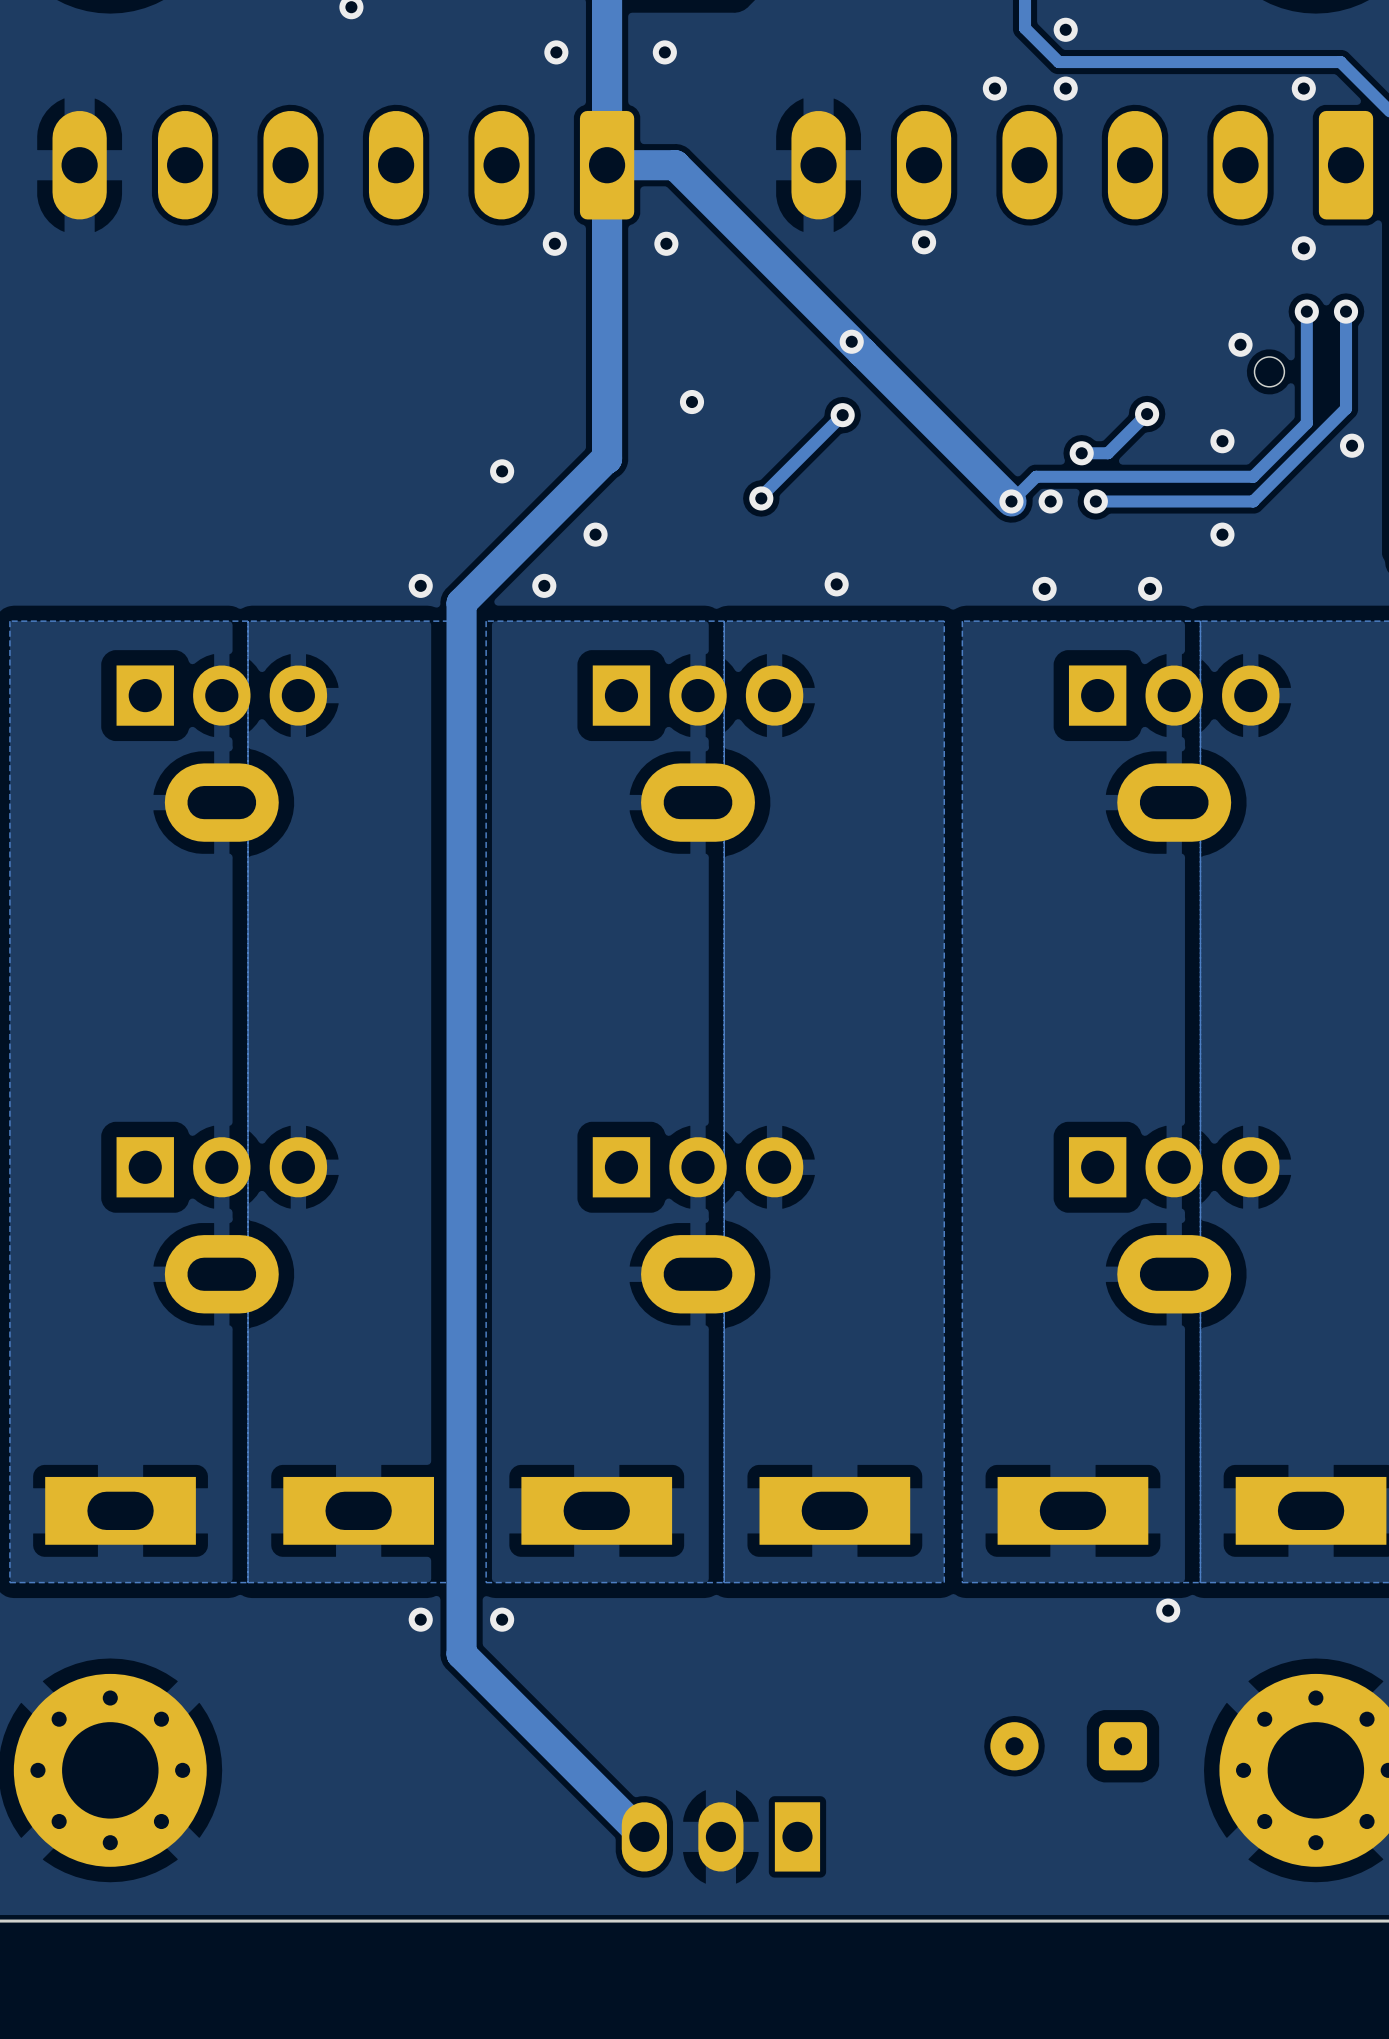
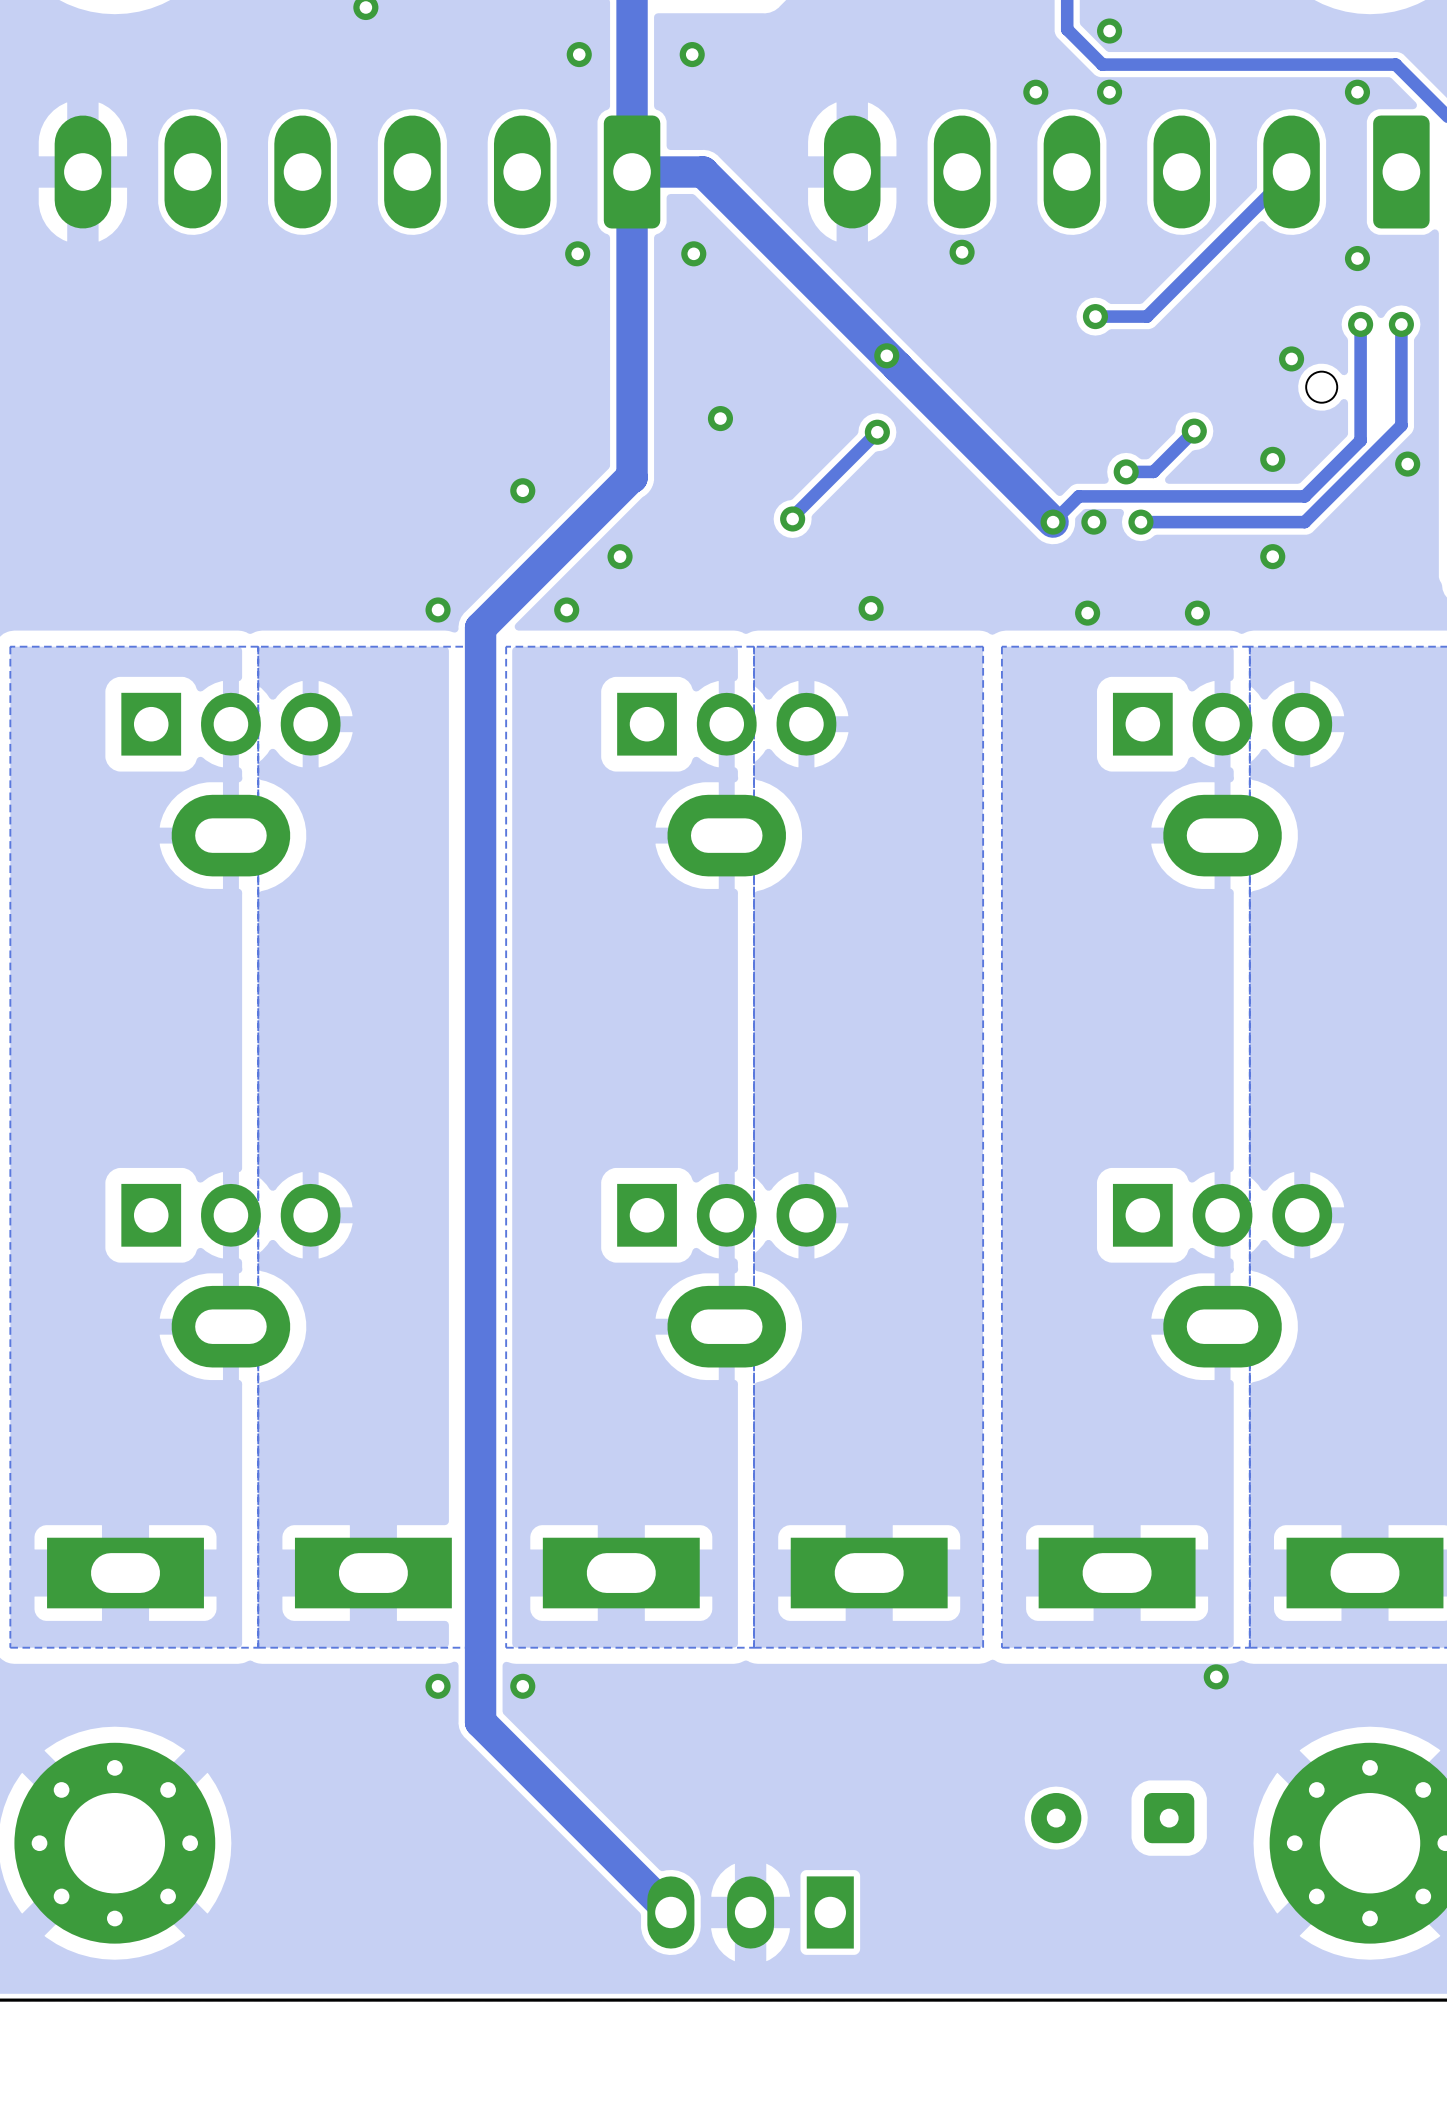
track: none -> (1291, 172) (1146, 316) (1095, 316)
via: none -> (1095, 316)

